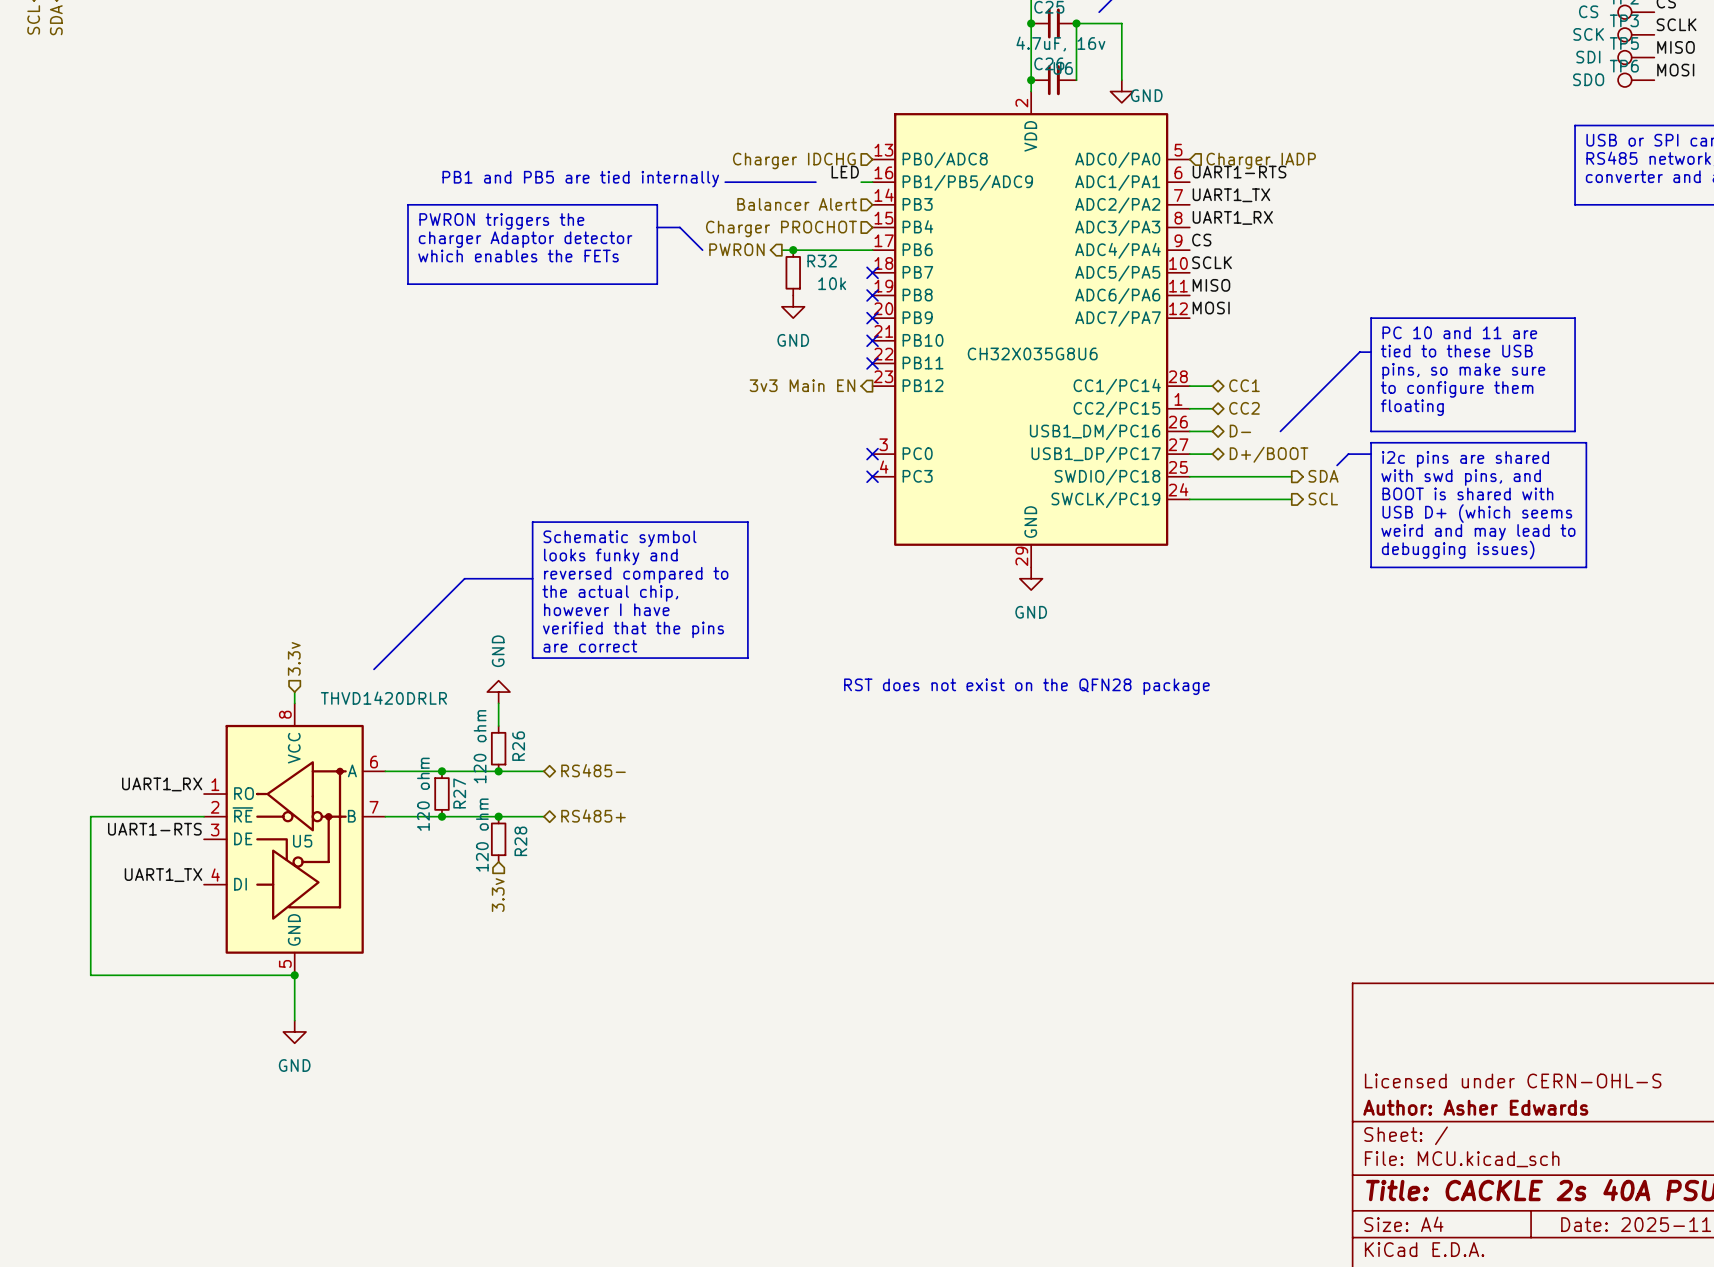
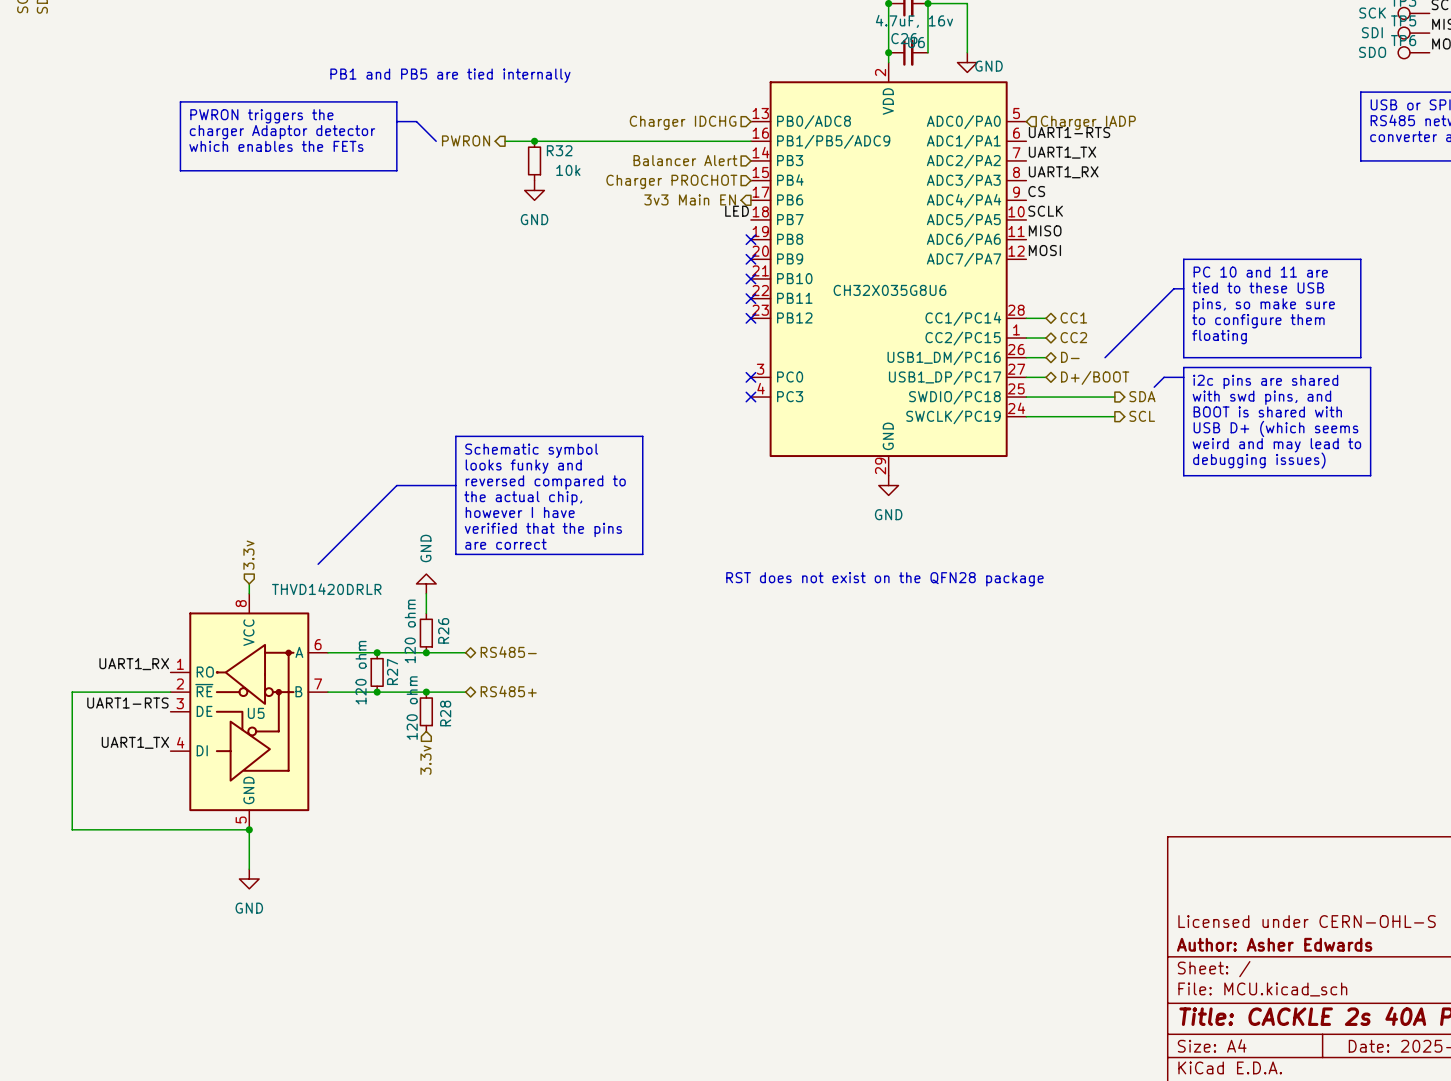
label position: LED (845, 172) -> LED (737, 211)
text position: PB1 and PB5 are tied internally (580, 179) -> PB1 and PB5 are tied internally (450, 75)
wire: none -> (505, 141) (741, 141)
junction: none -> (534, 141)
line: (725, 182) (815, 182) -> none
line: (408, 204) (657, 204) (657, 284) (408, 284) (408, 204) -> (180, 101) (396, 101) (396, 170) (180, 170) (180, 101)
text position: PWRON triggers the (501, 221) -> PWRON triggers the (261, 116)
line: (657, 227) (679, 227) (702, 250) -> (396, 121) (416, 121) (436, 141)
text position: charger Adaptor detector (525, 239) -> charger Adaptor detector (282, 132)
hierarchical label position: PWRON (736, 249) -> PWRON (466, 140)
wire: (781, 250) (872, 250) -> none
junction: (793, 250) -> none
text position: which enables the FETs (518, 256) -> which enables the FETs (276, 146)
R32 position: (793, 272) -> (534, 160)
no-connect mark: (872, 272) -> none
power symbol position: GND (793, 306) -> GND (534, 190)
hierarchical label position: 3v3 Main EN (802, 385) -> 3v3 Main EN (690, 199)
no-connect mark: none -> (750, 318)

